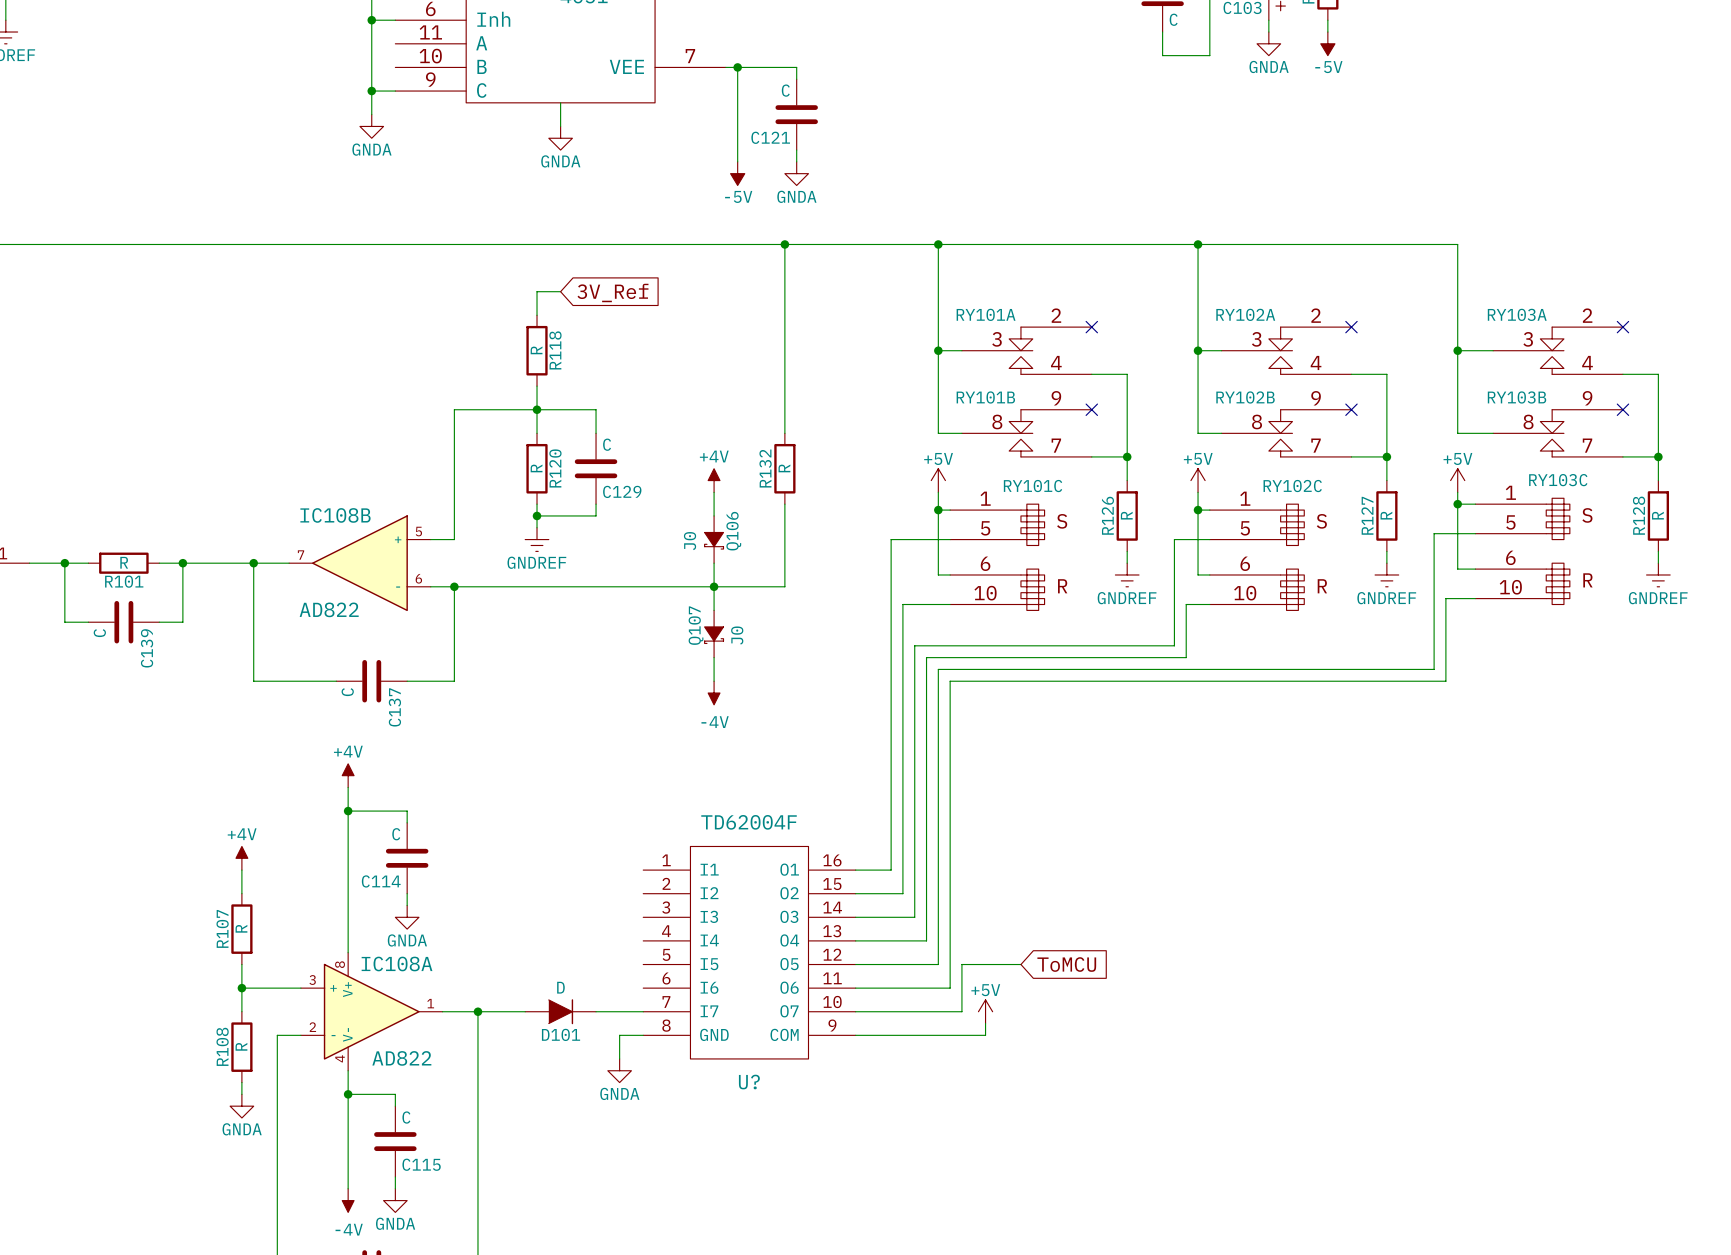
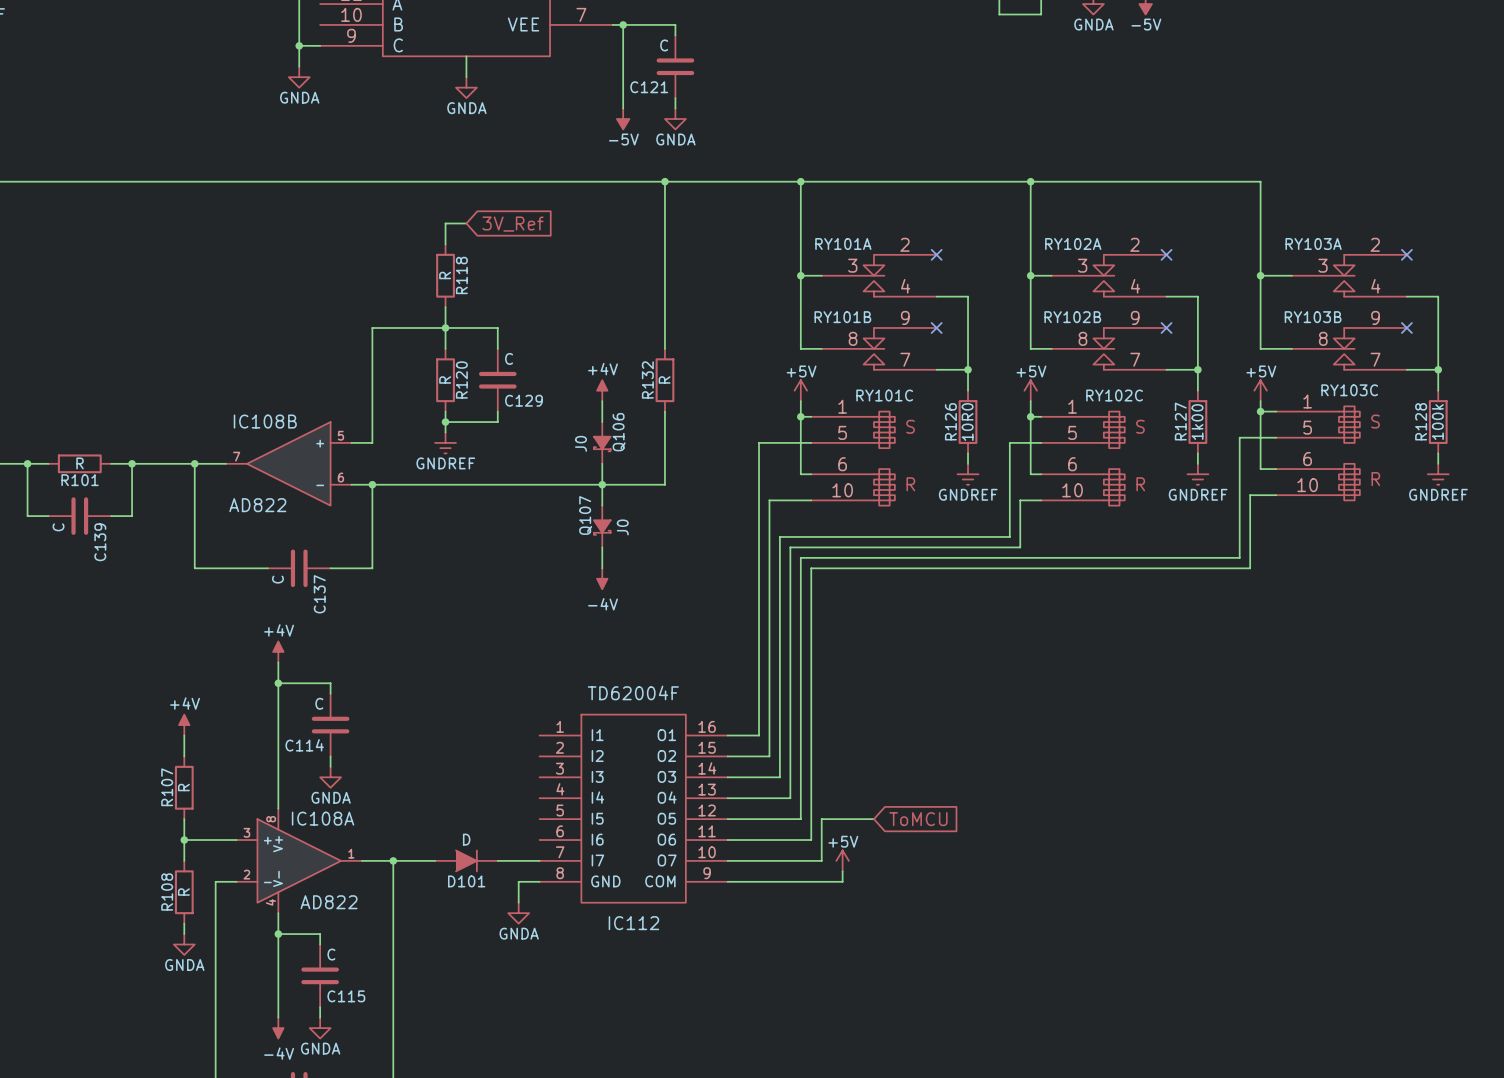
R126 value: R (1126, 515) -> 10R0 (967, 422)
R127 value: R (1386, 515) -> 1k00 (1197, 422)
R128 value: R (1657, 515) -> 100k (1437, 422)
U? name: U? (749, 1082) -> IC112 (633, 923)

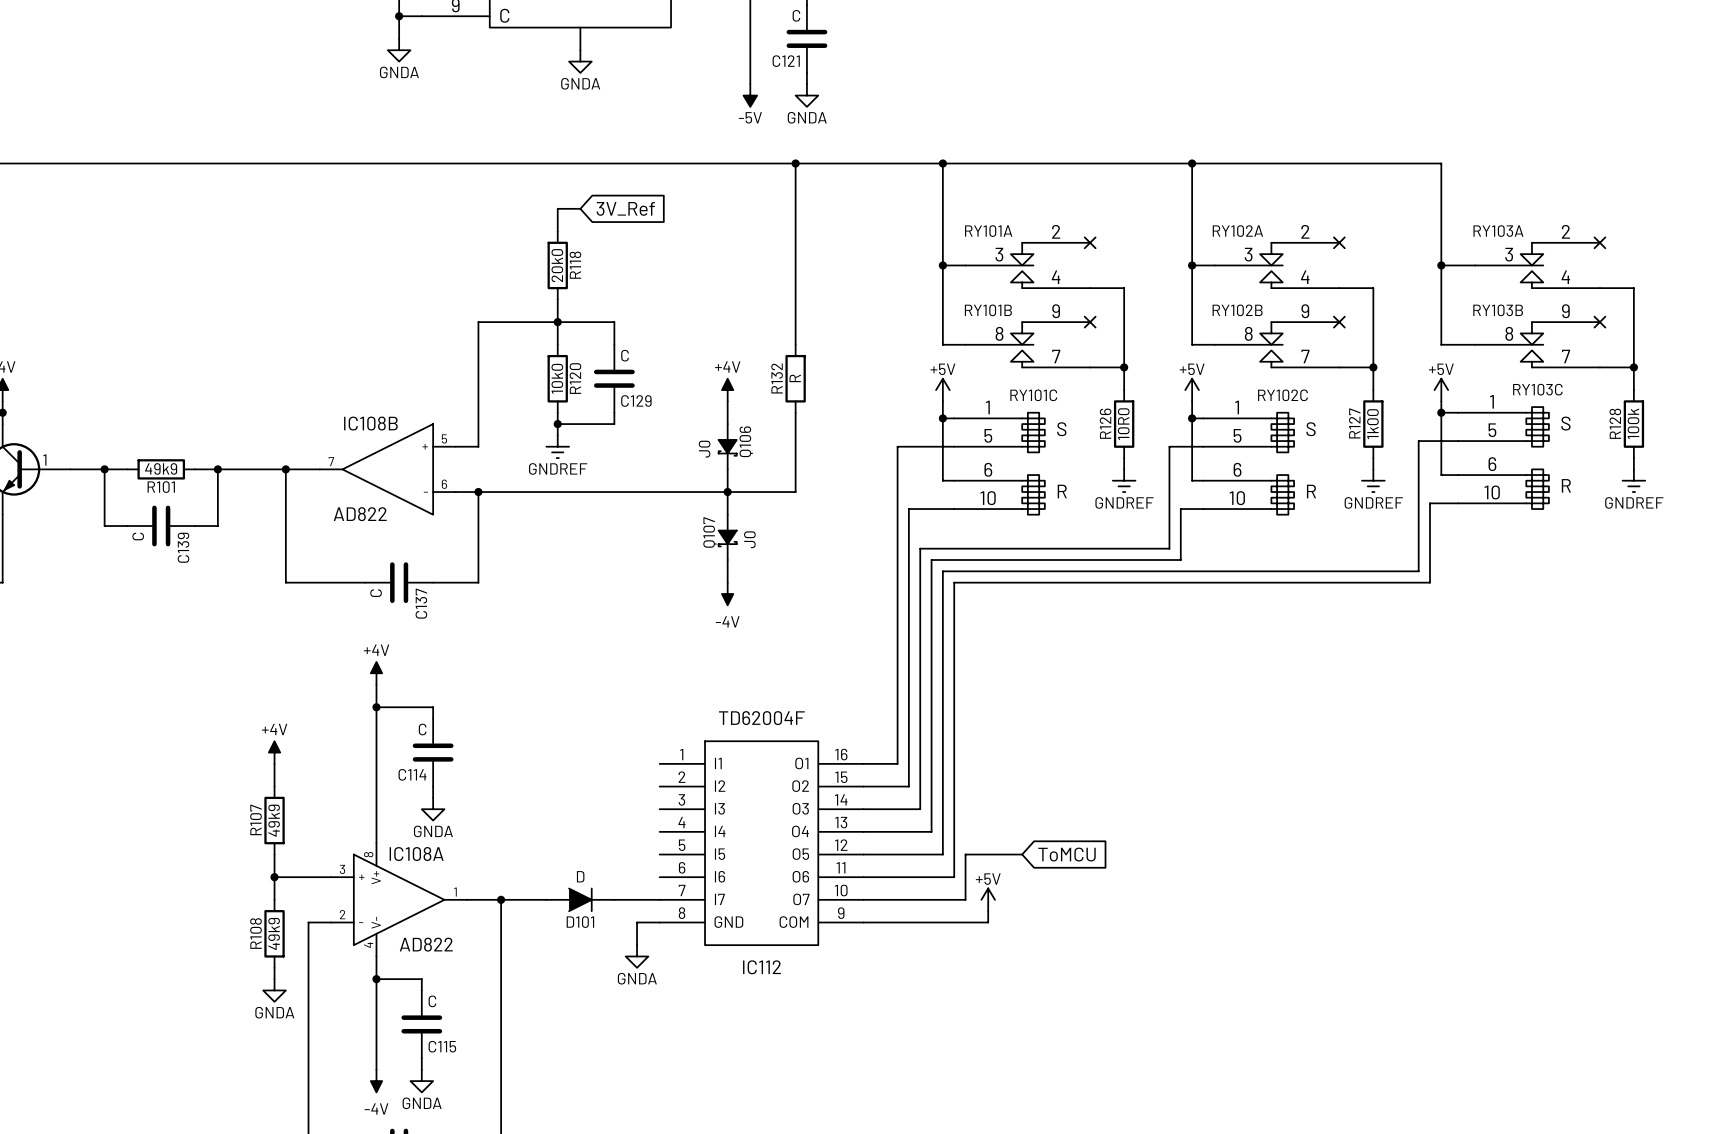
R118 value: R (445, 275) -> 20k0 (557, 265)
R120 value: R (445, 379) -> 10k0 (557, 378)
R101 value: R (80, 463) -> 49k9 (161, 468)
R107 value: R (183, 787) -> 49k9 (274, 820)
R108 value: R (183, 892) -> 49k9 (274, 933)

